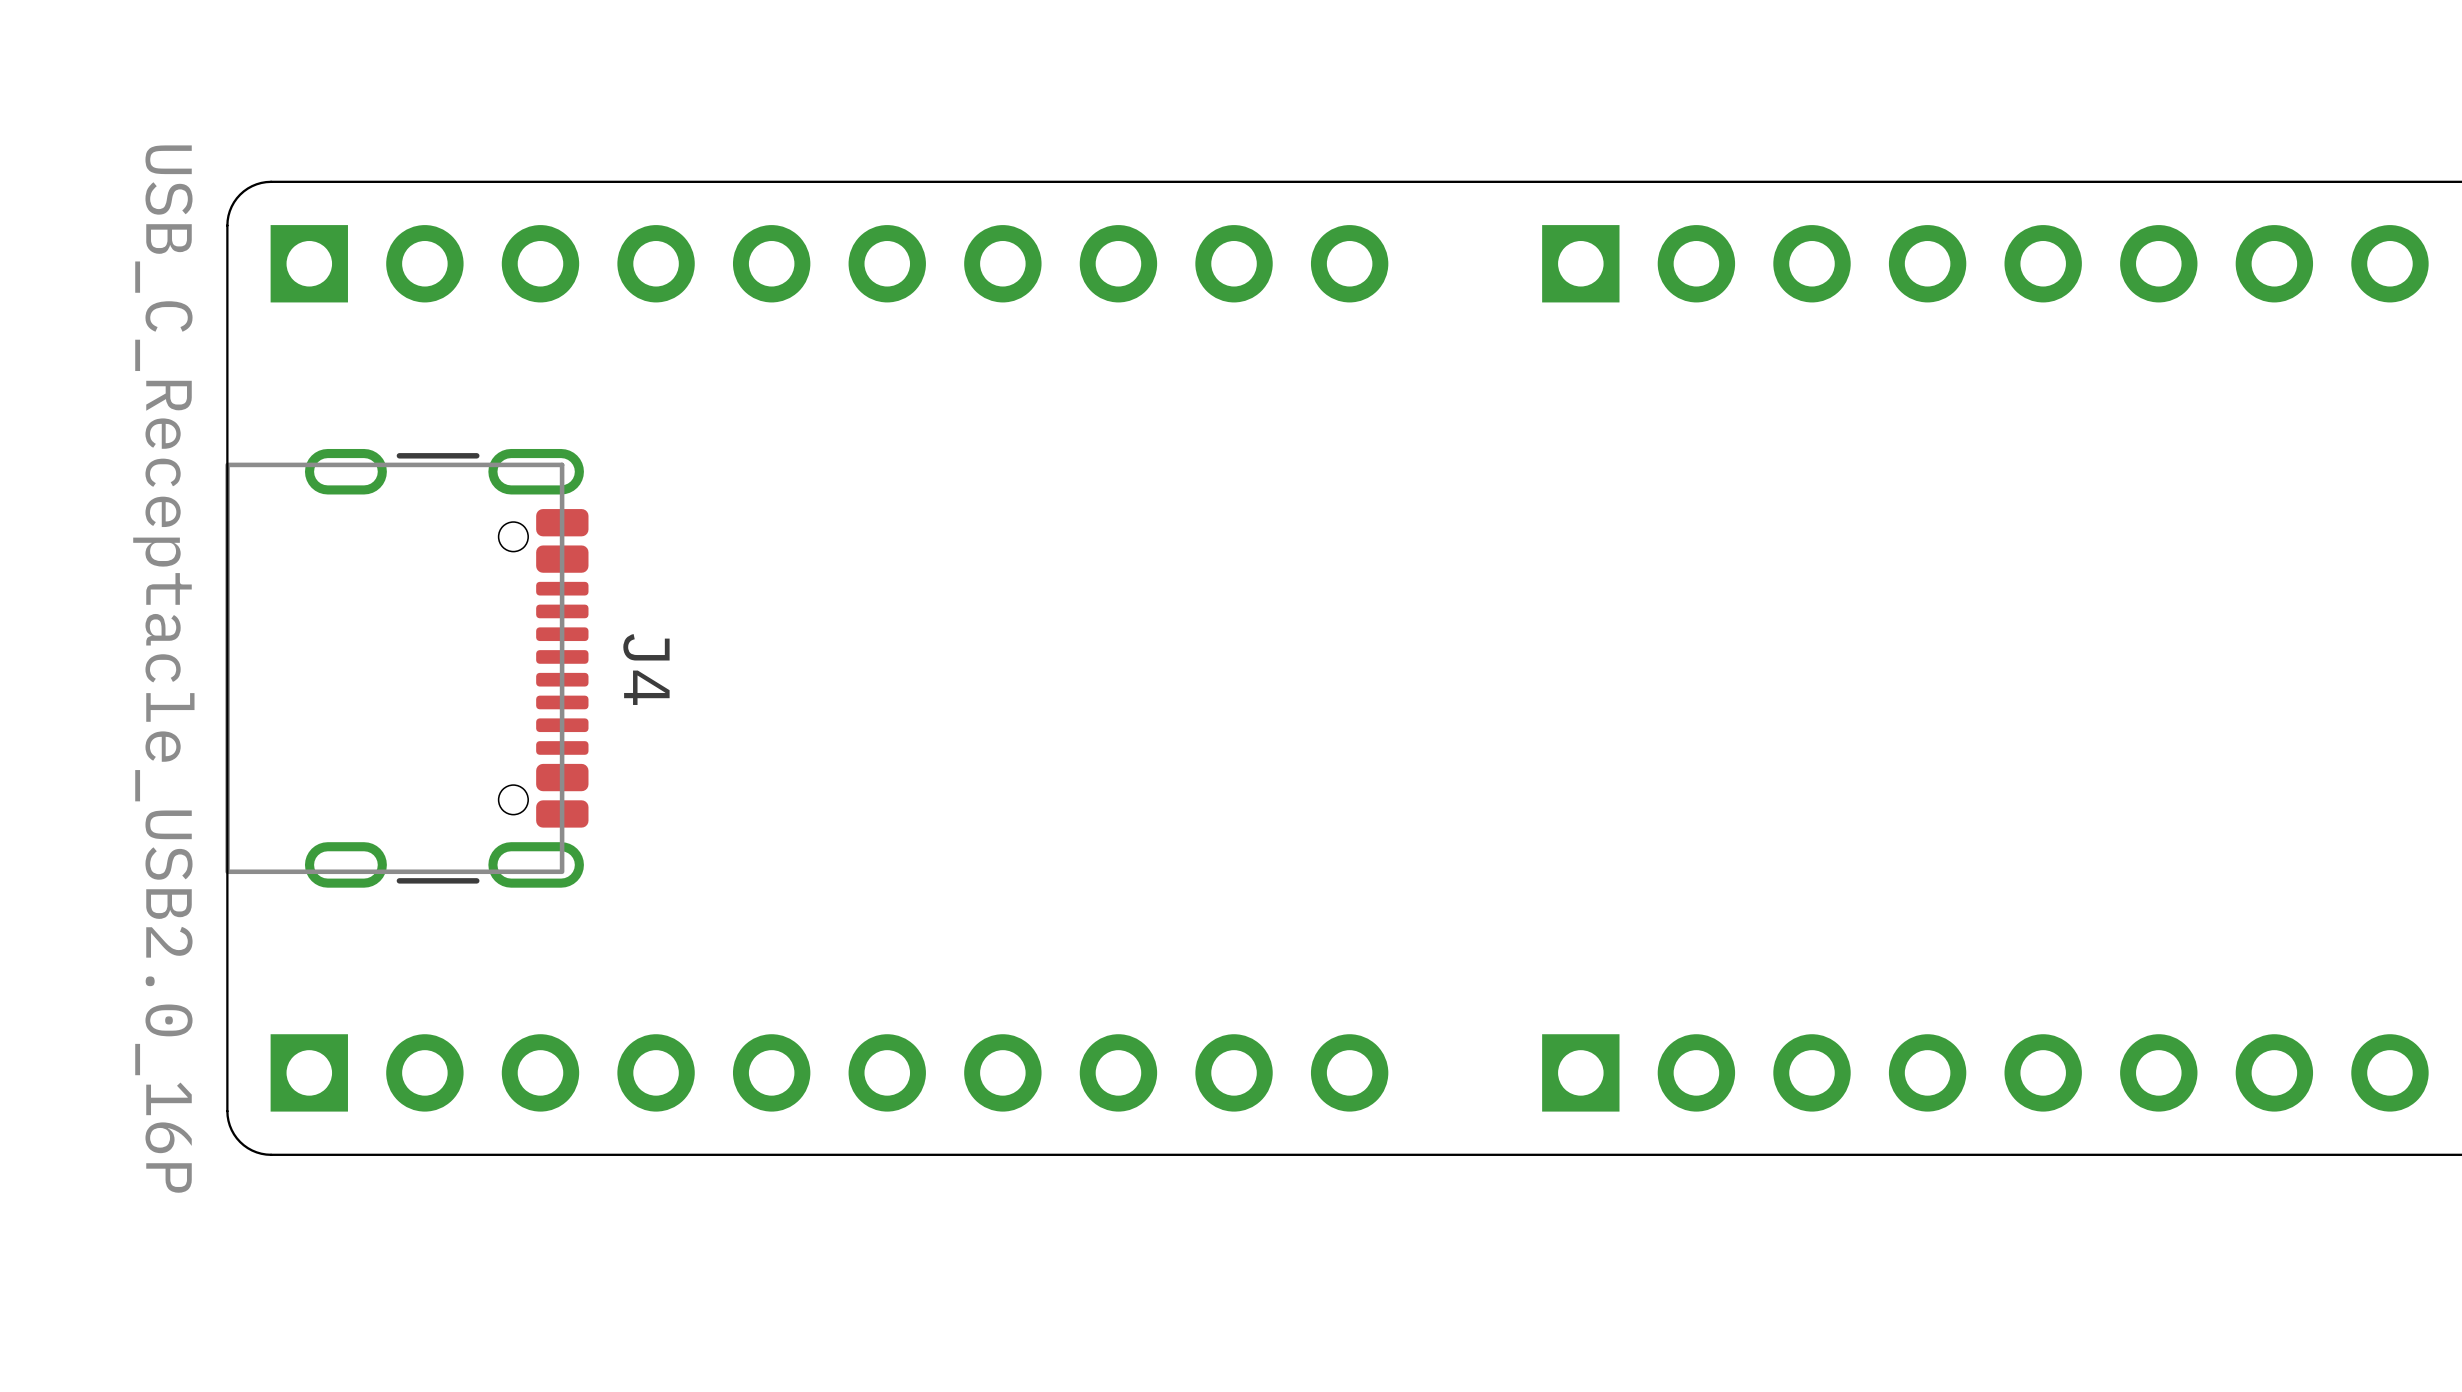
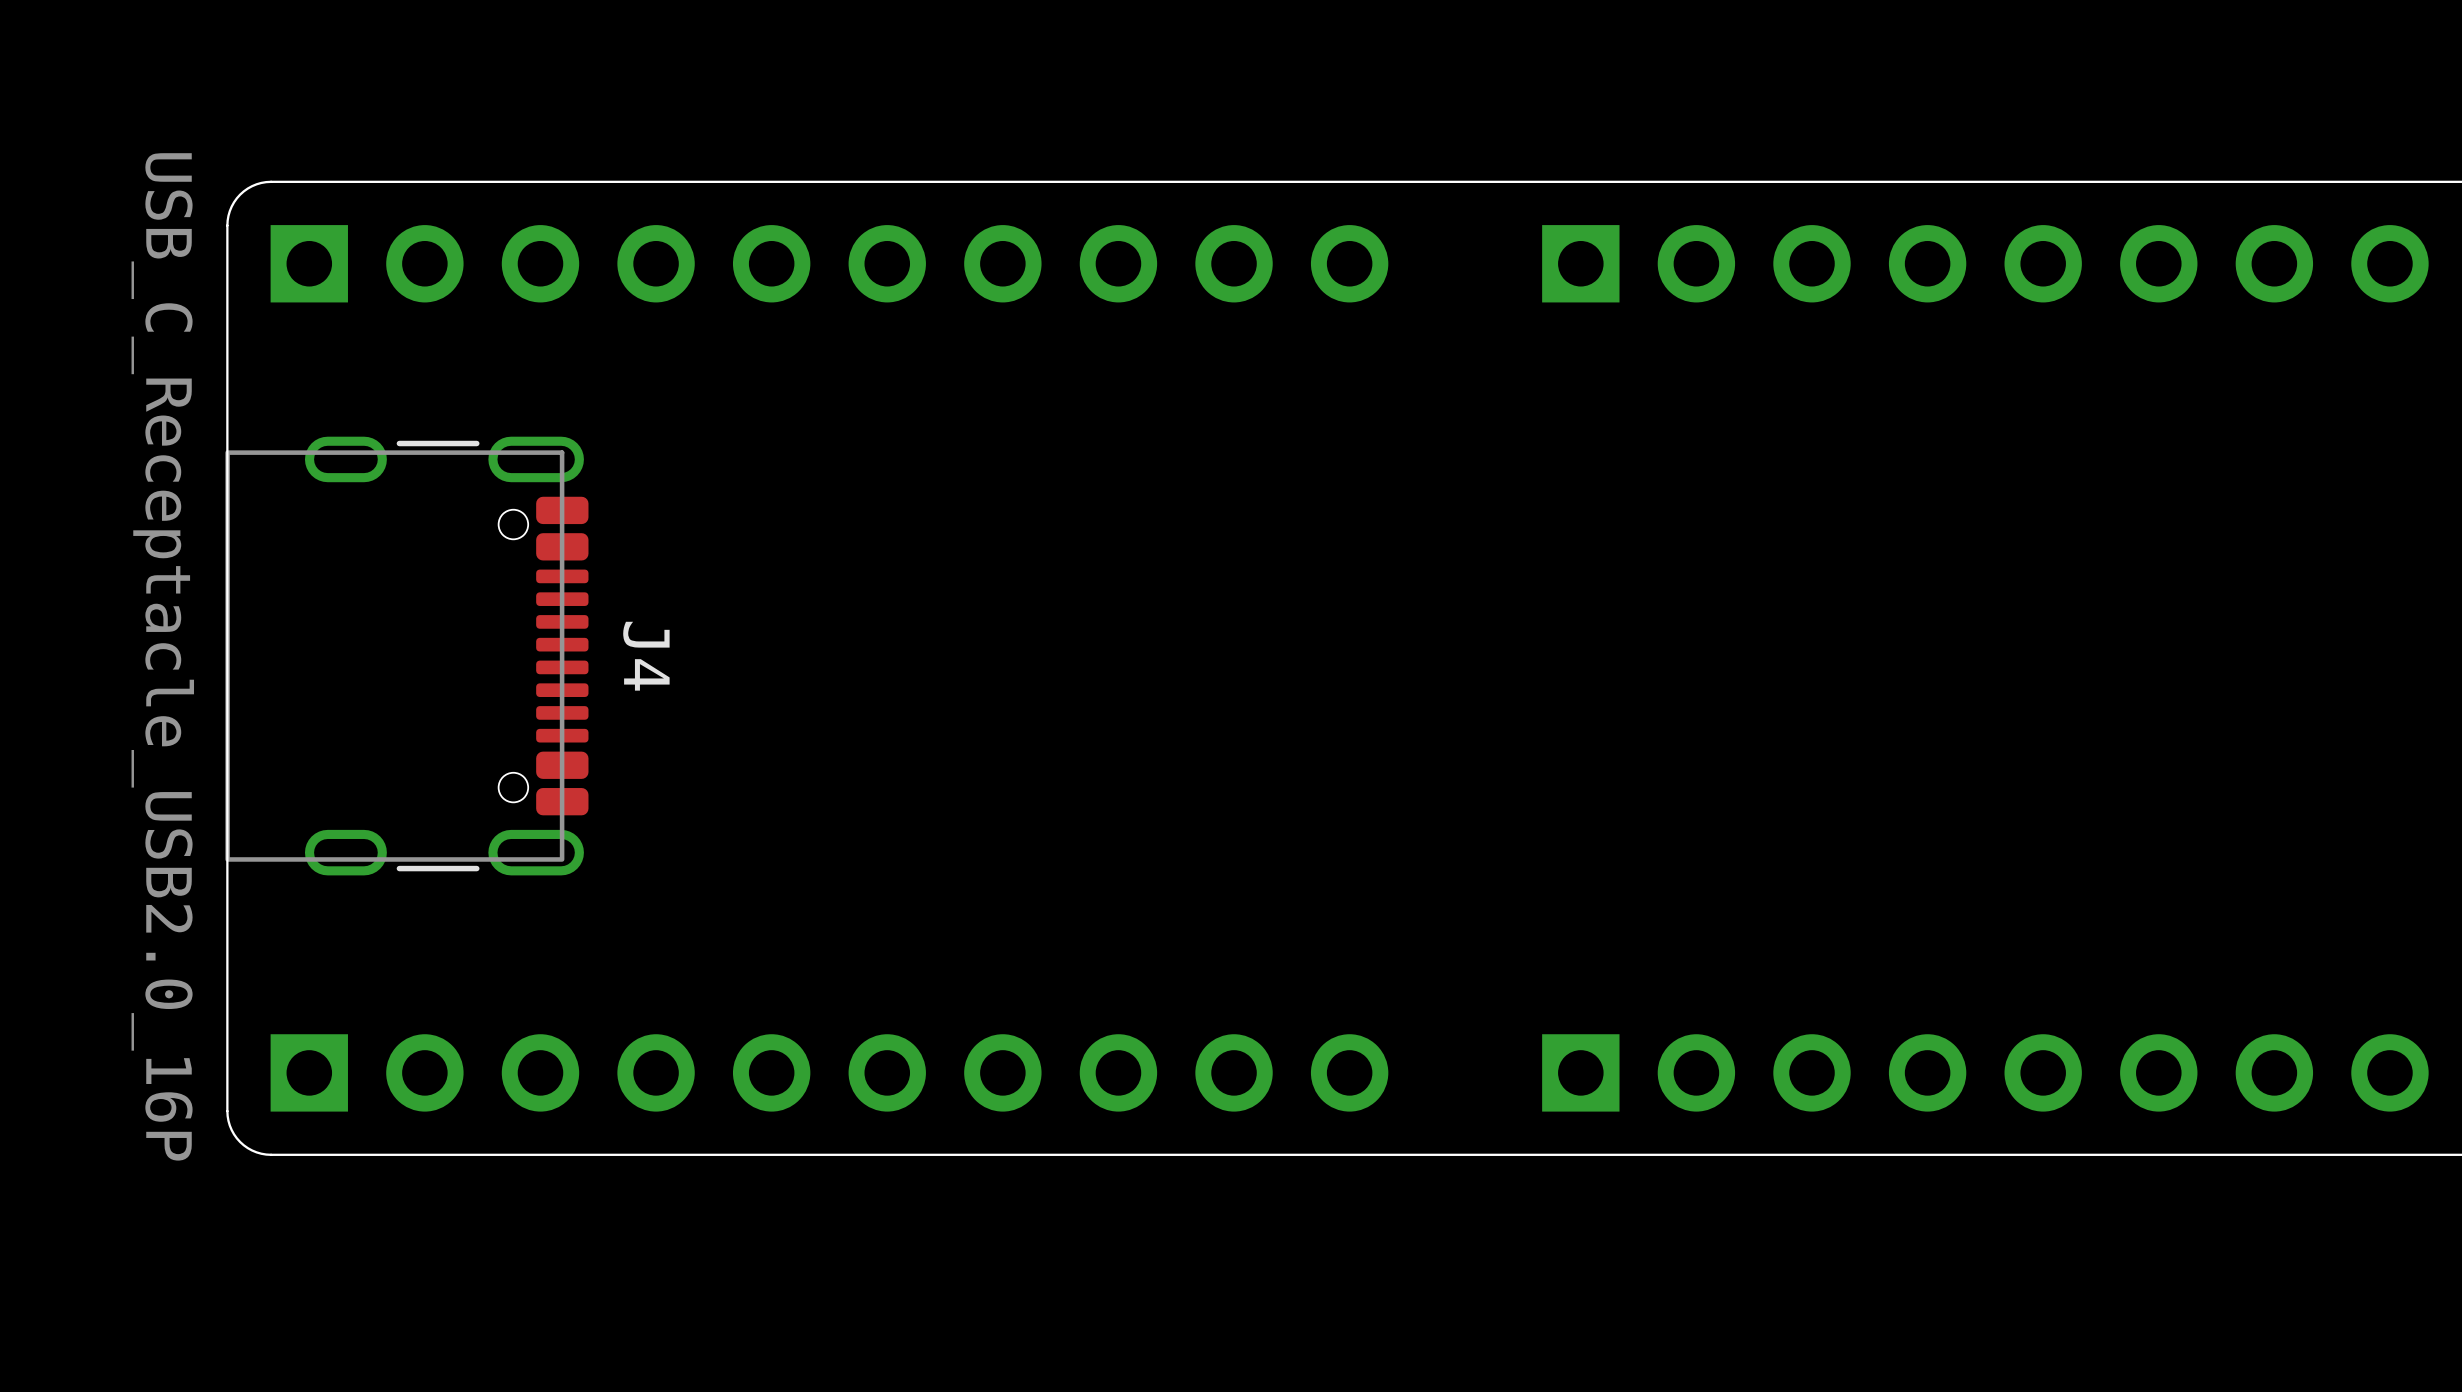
J4 position: (406, 668) -> (406, 656)

